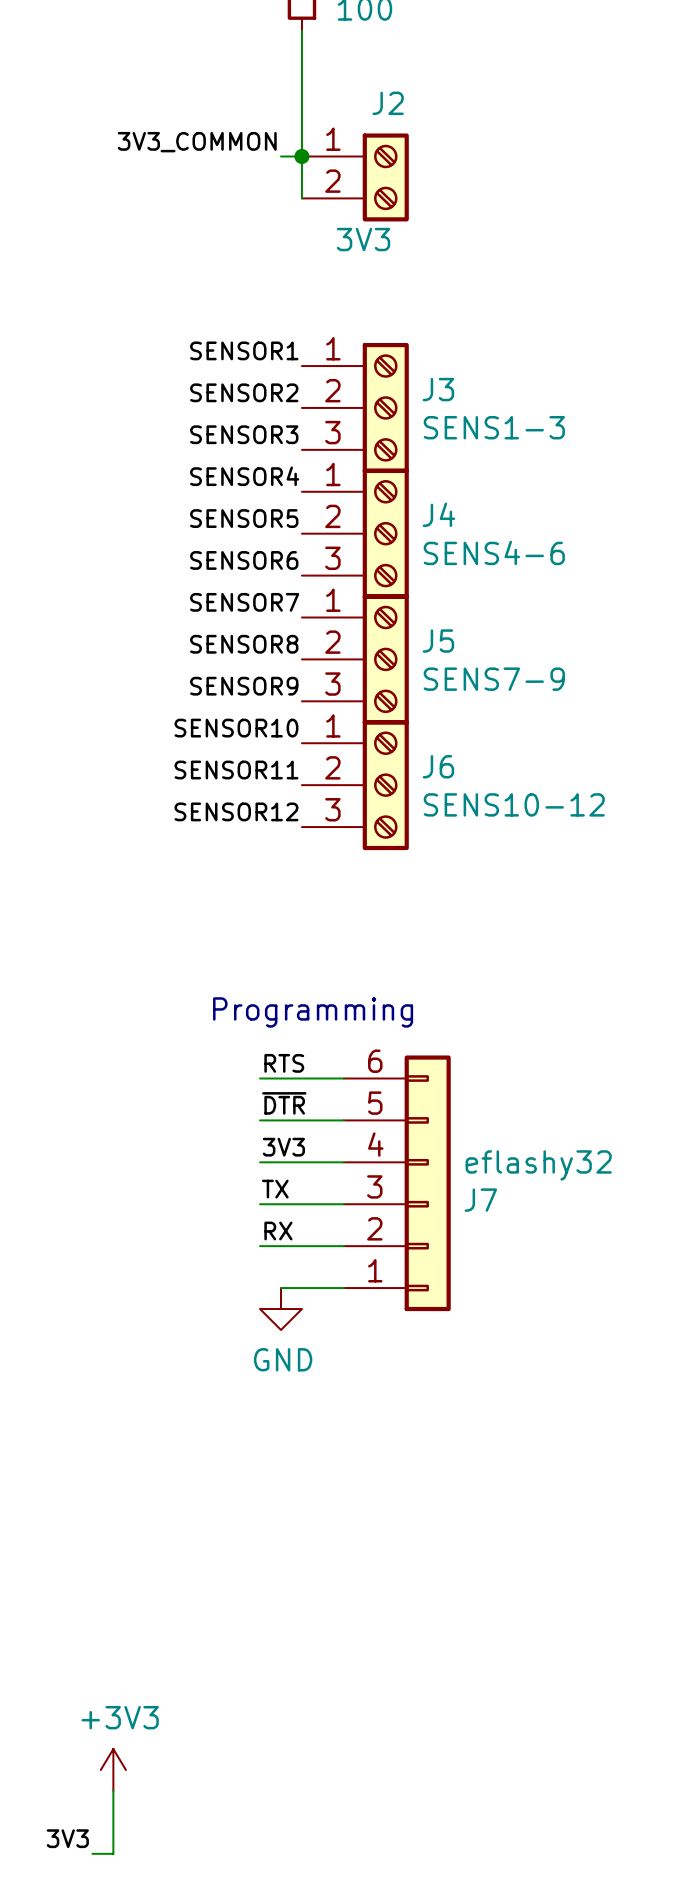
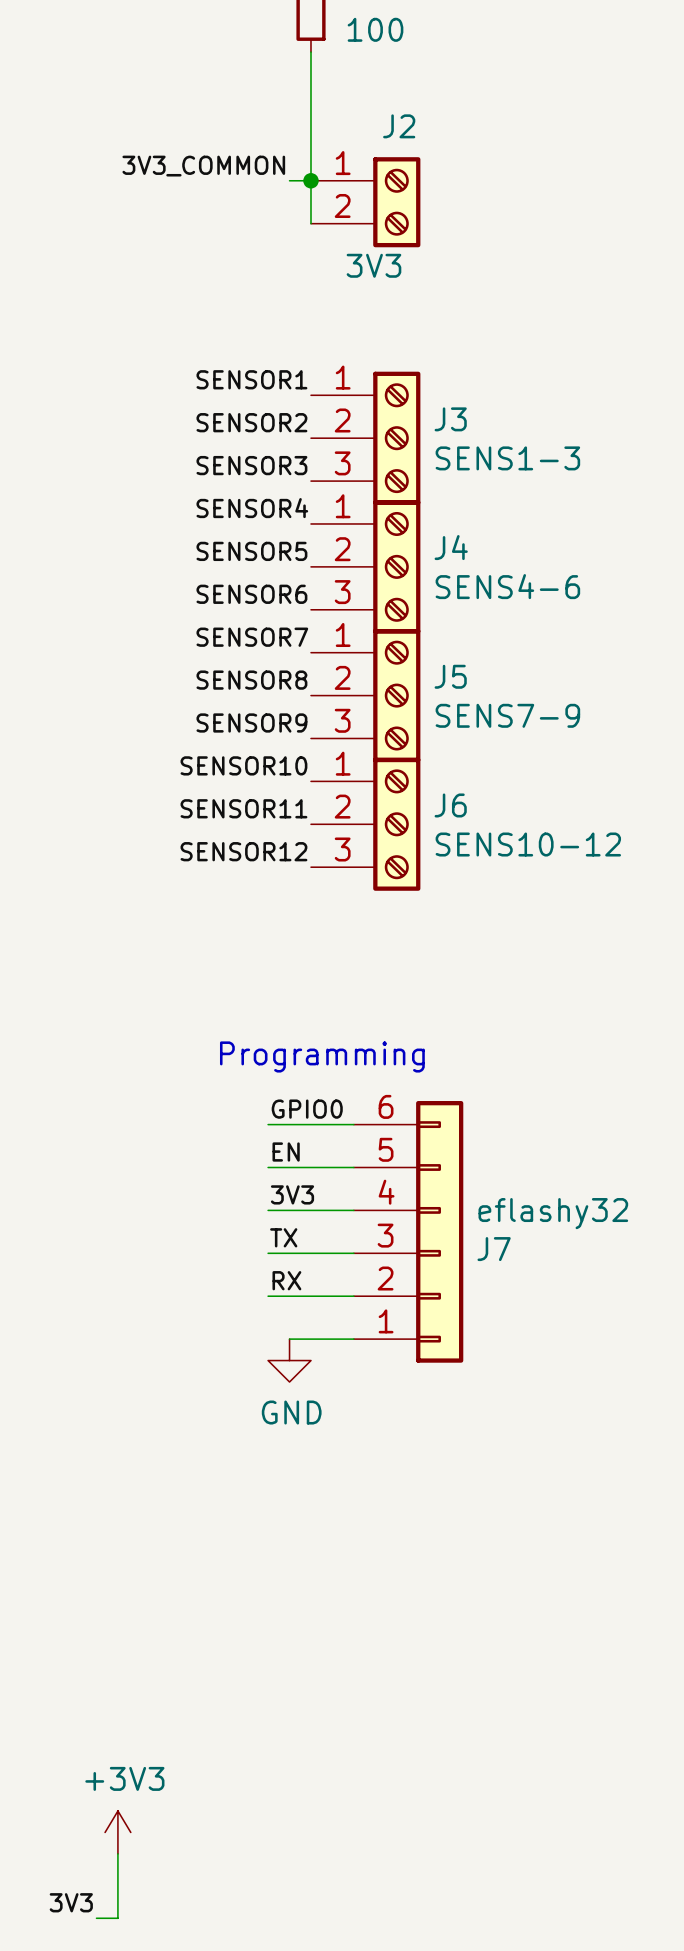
label: RTS (284, 1063) -> GPIO0 (307, 1109)
label: ~{DTR} (284, 1103) -> EN (286, 1152)

